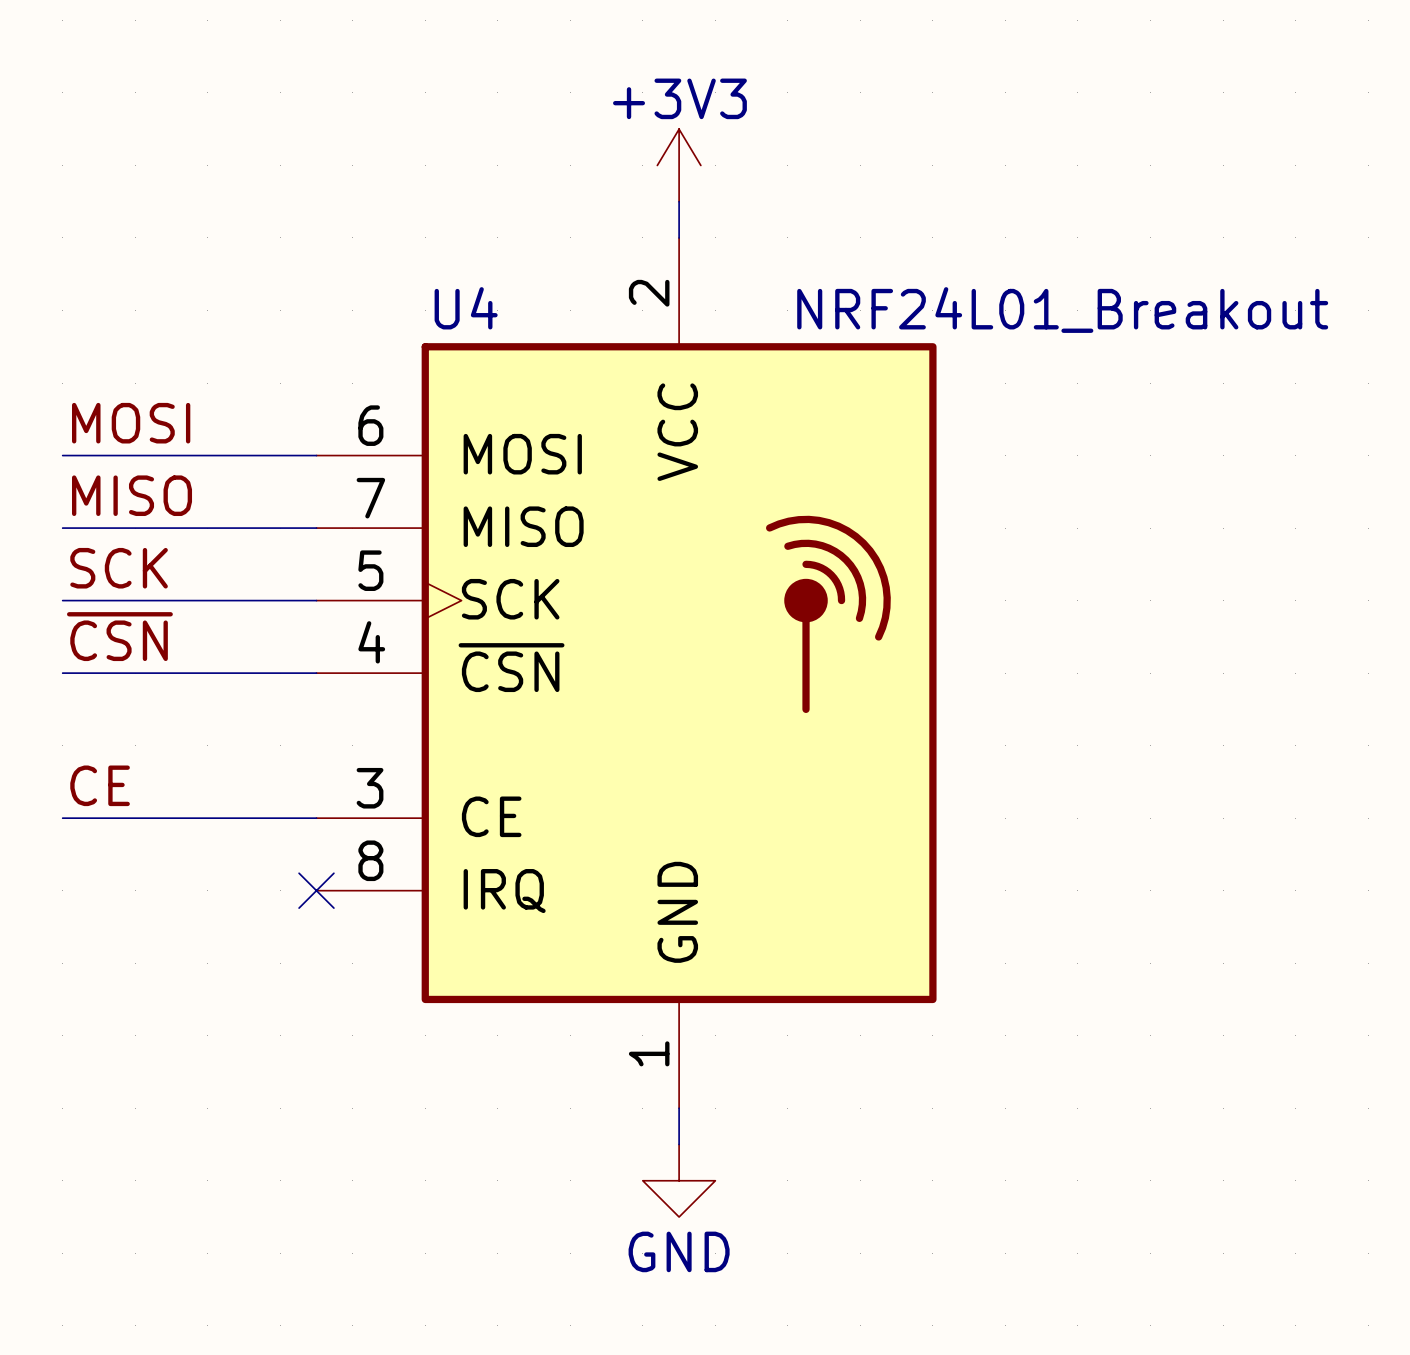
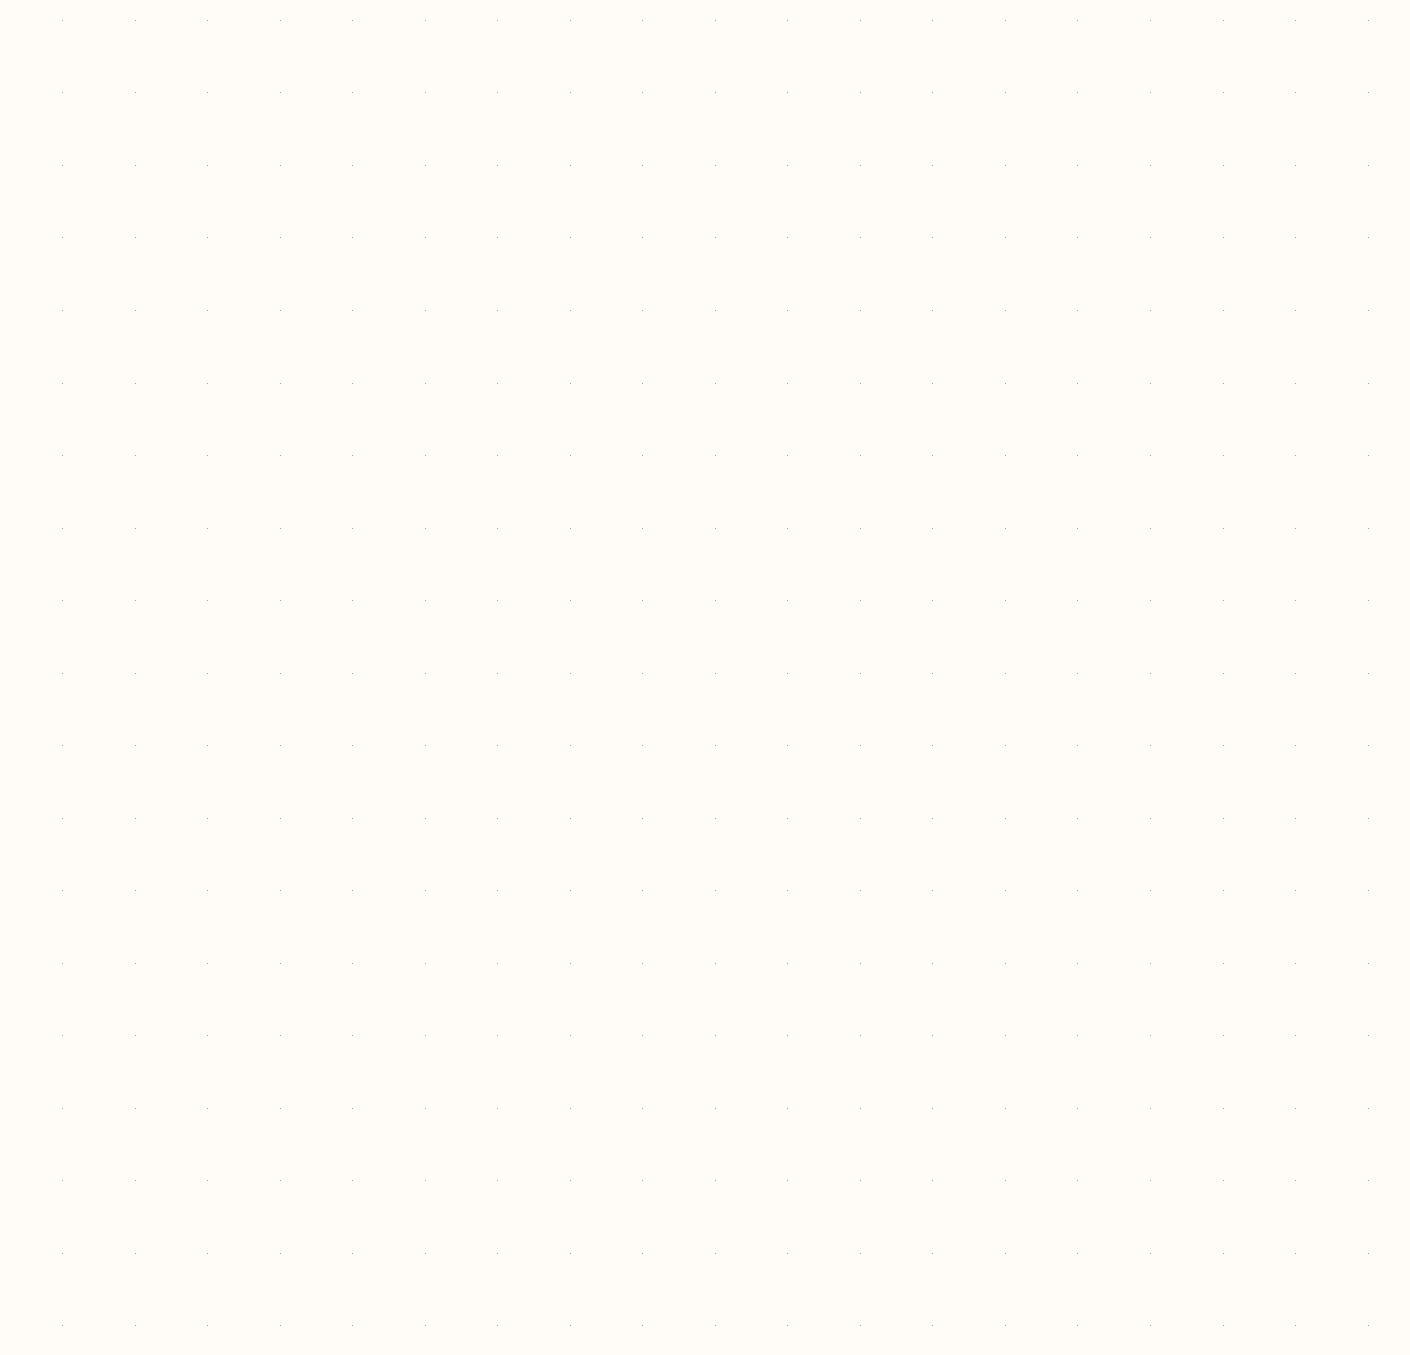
power symbol: +3V3 (679, 165) -> none
wire: (679, 201) (679, 237) -> none
label: MOSI (131, 423) -> none
wire: (62, 455) (316, 455) -> none
label: MISO (132, 495) -> none
wire: (62, 528) (316, 528) -> none
label: SCK (119, 568) -> none
wire: (62, 600) (316, 600) -> none
label: ~{CSN} (119, 636) -> none
wire: (62, 673) (316, 673) -> none
U4: NRF24L01_Breakout (626, 673) -> none
label: CE (100, 785) -> none
wire: (62, 818) (316, 818) -> none
no-connect mark: (316, 890) -> none
wire: (679, 1108) (679, 1144) -> none
power symbol: GND (679, 1180) -> none

